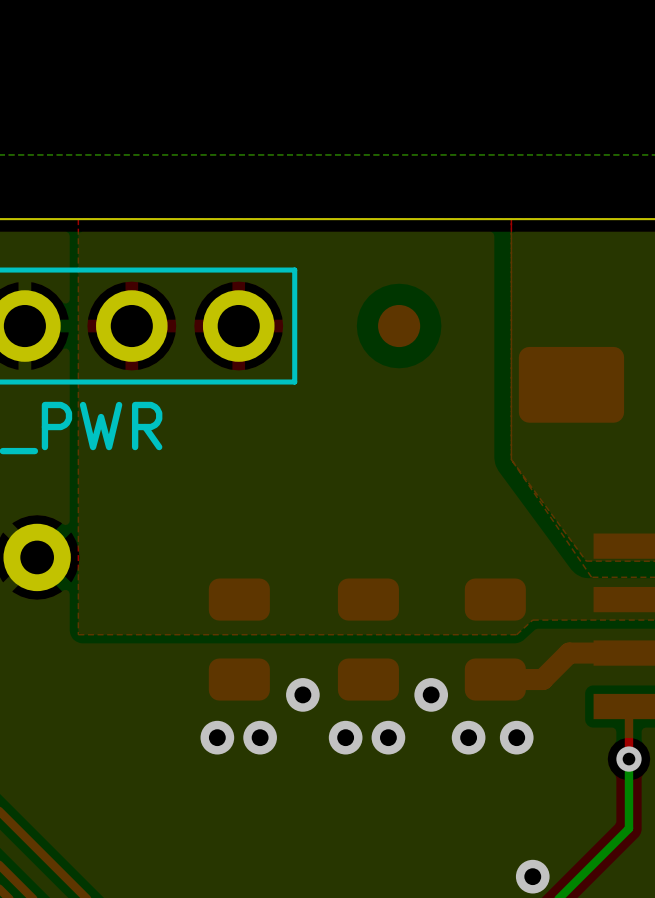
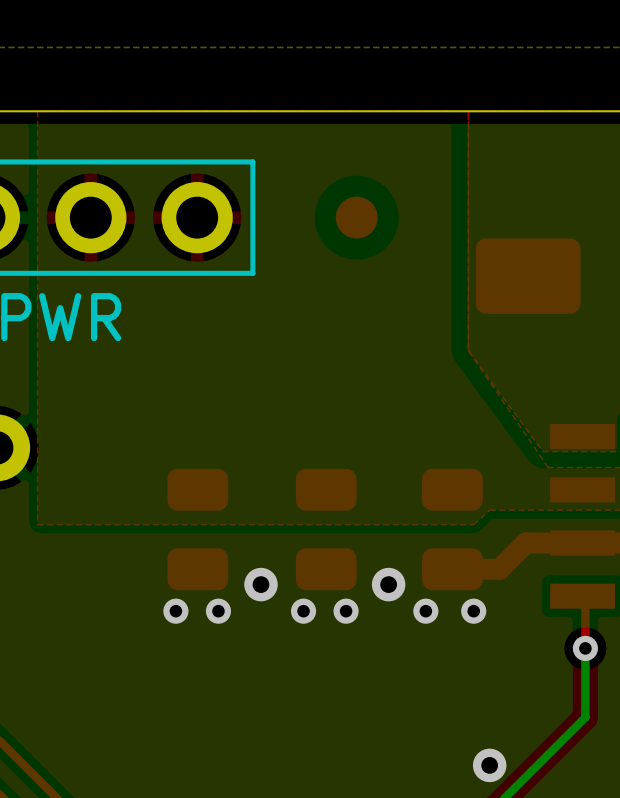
via size: [200, 720, 235, 755] -> [163, 598, 189, 624]
via size: [243, 720, 277, 755] -> [205, 598, 232, 624]
via size: [328, 720, 363, 755] -> [290, 598, 317, 624]
via size: [371, 720, 406, 755] -> [333, 598, 359, 624]
via size: [451, 720, 486, 755] -> [413, 598, 439, 624]
via size: [499, 720, 534, 755] -> [461, 598, 487, 624]

